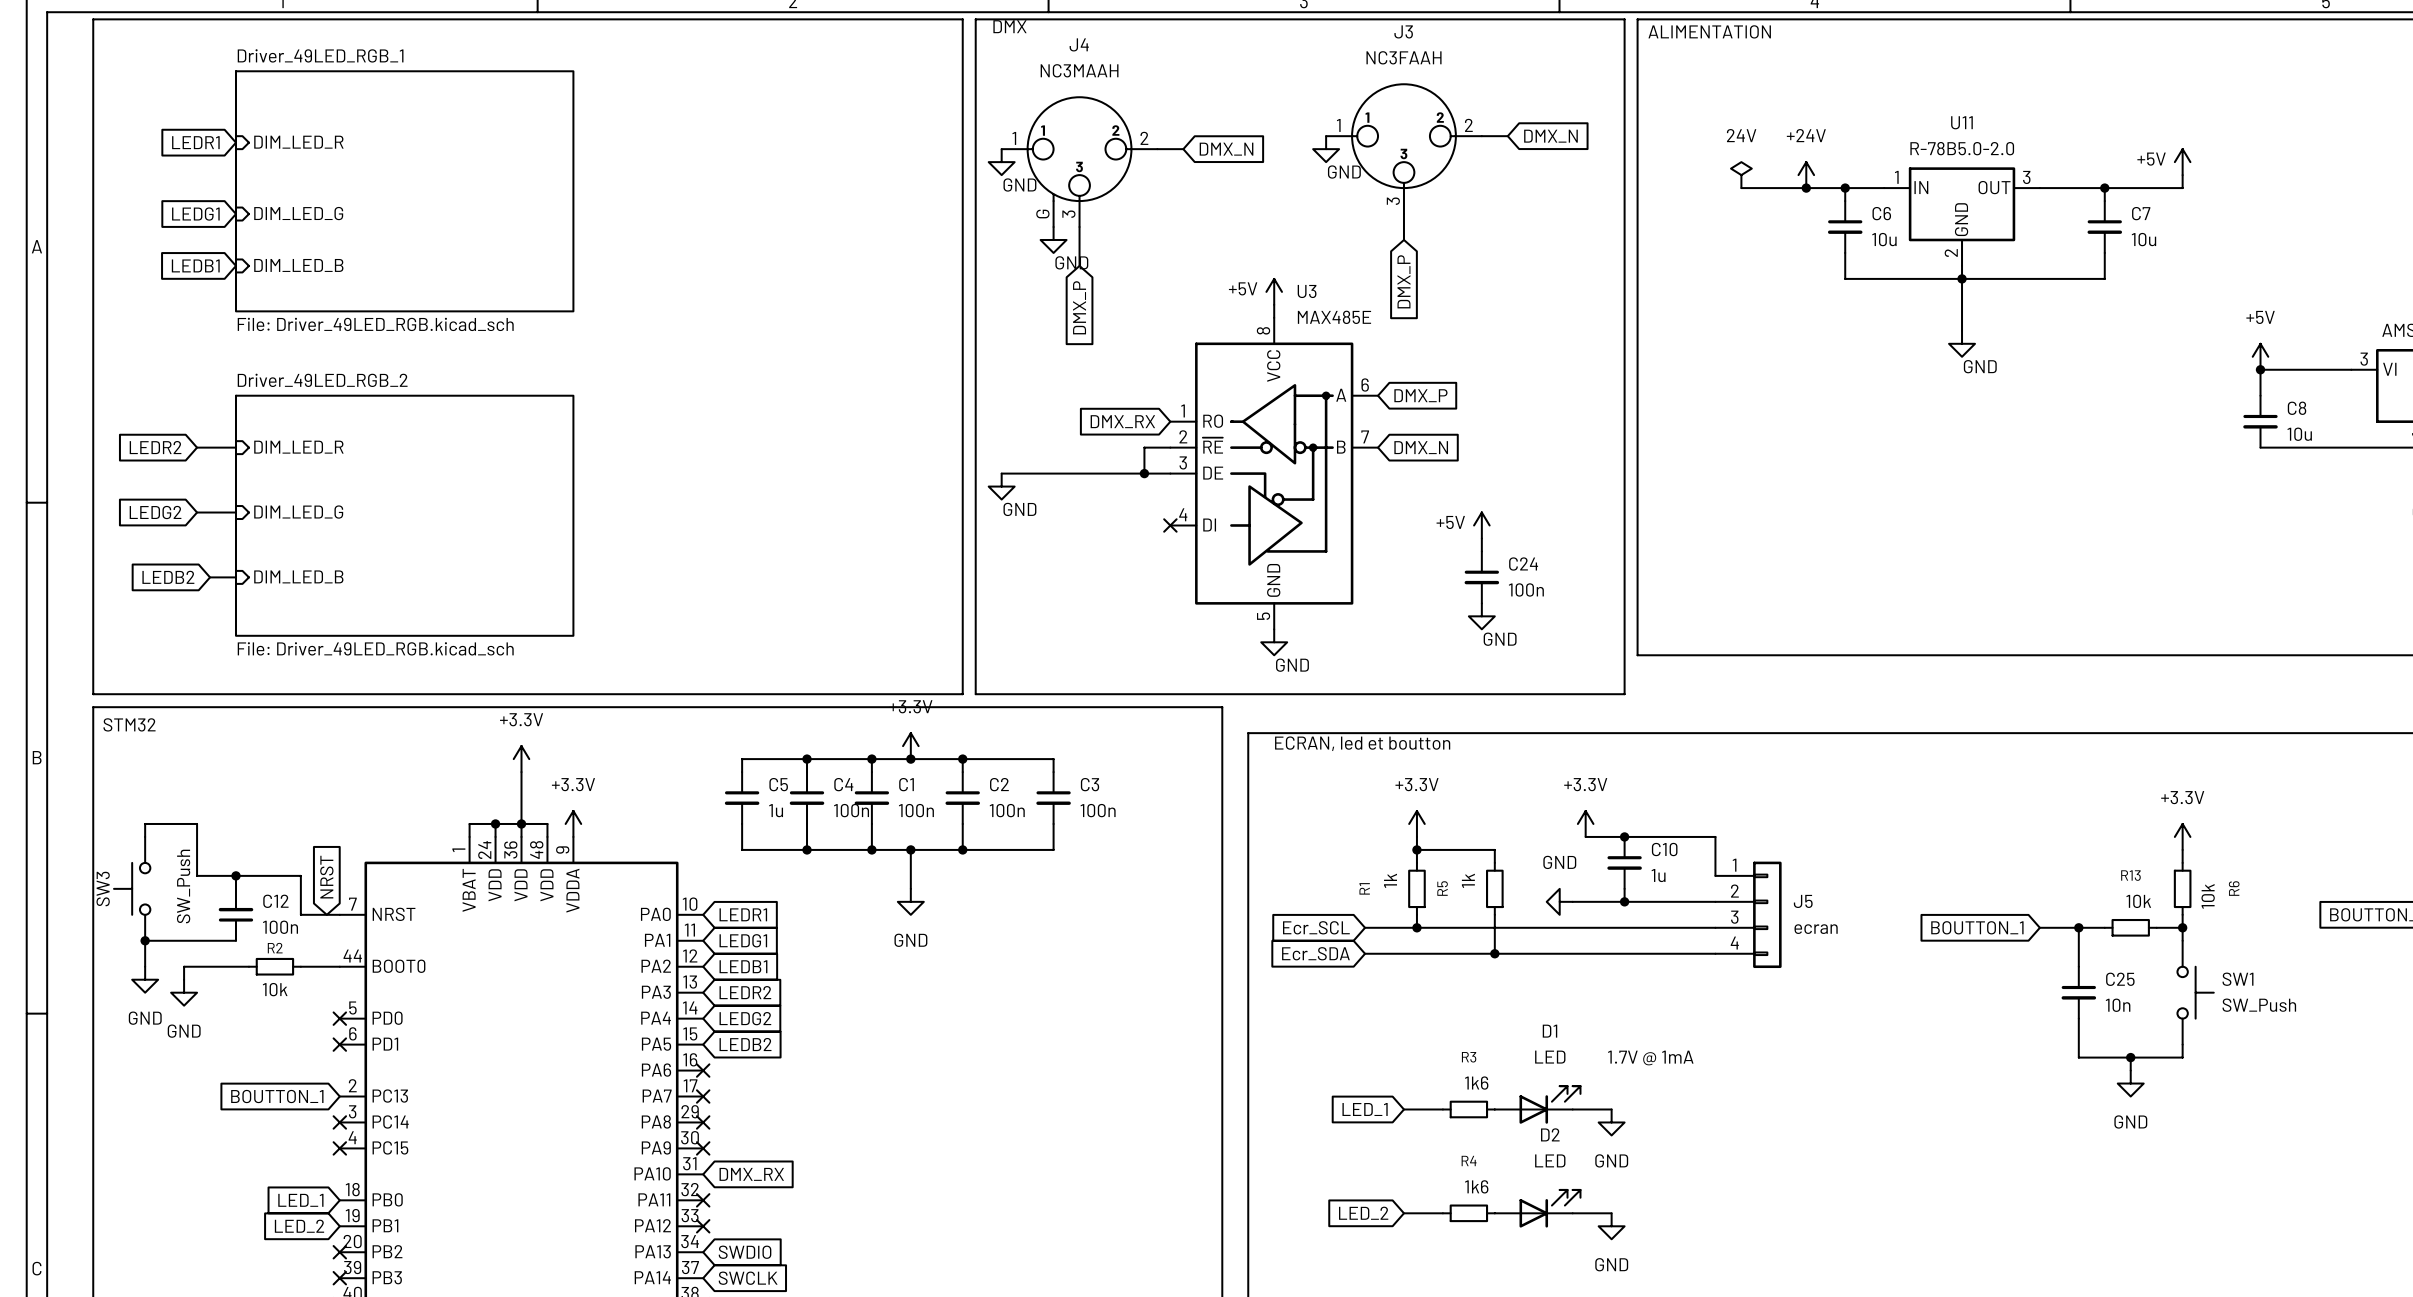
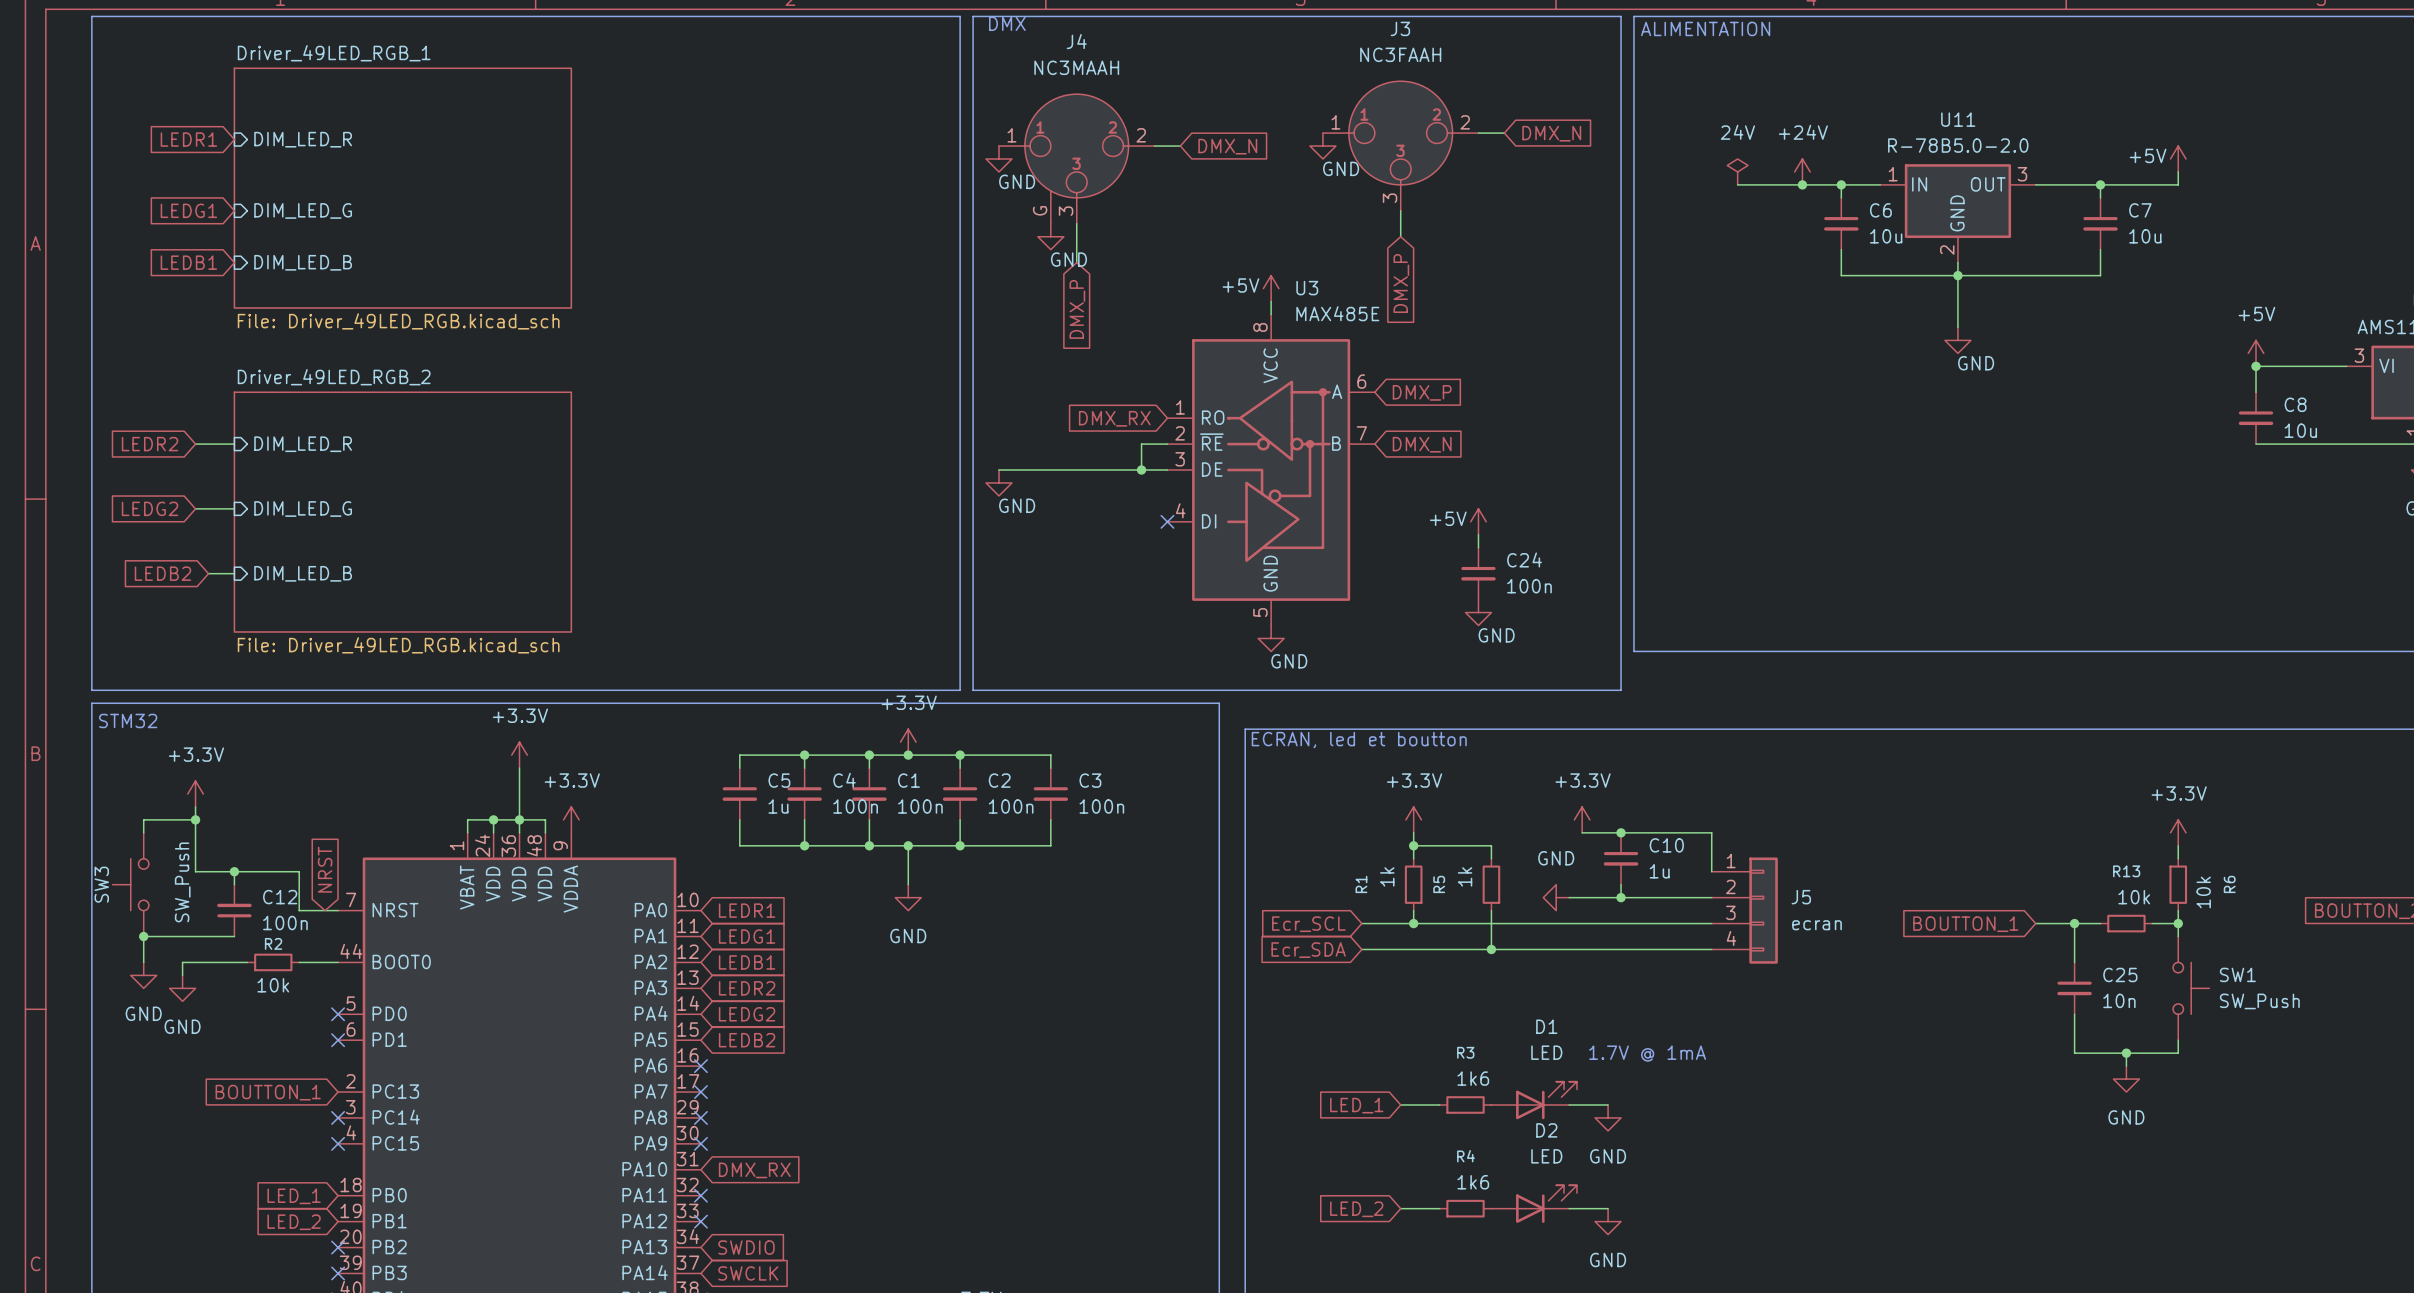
power symbol: none -> +3.3V (195, 793)
wire: none -> (195, 806) (195, 819)
junction: none -> (195, 819)

